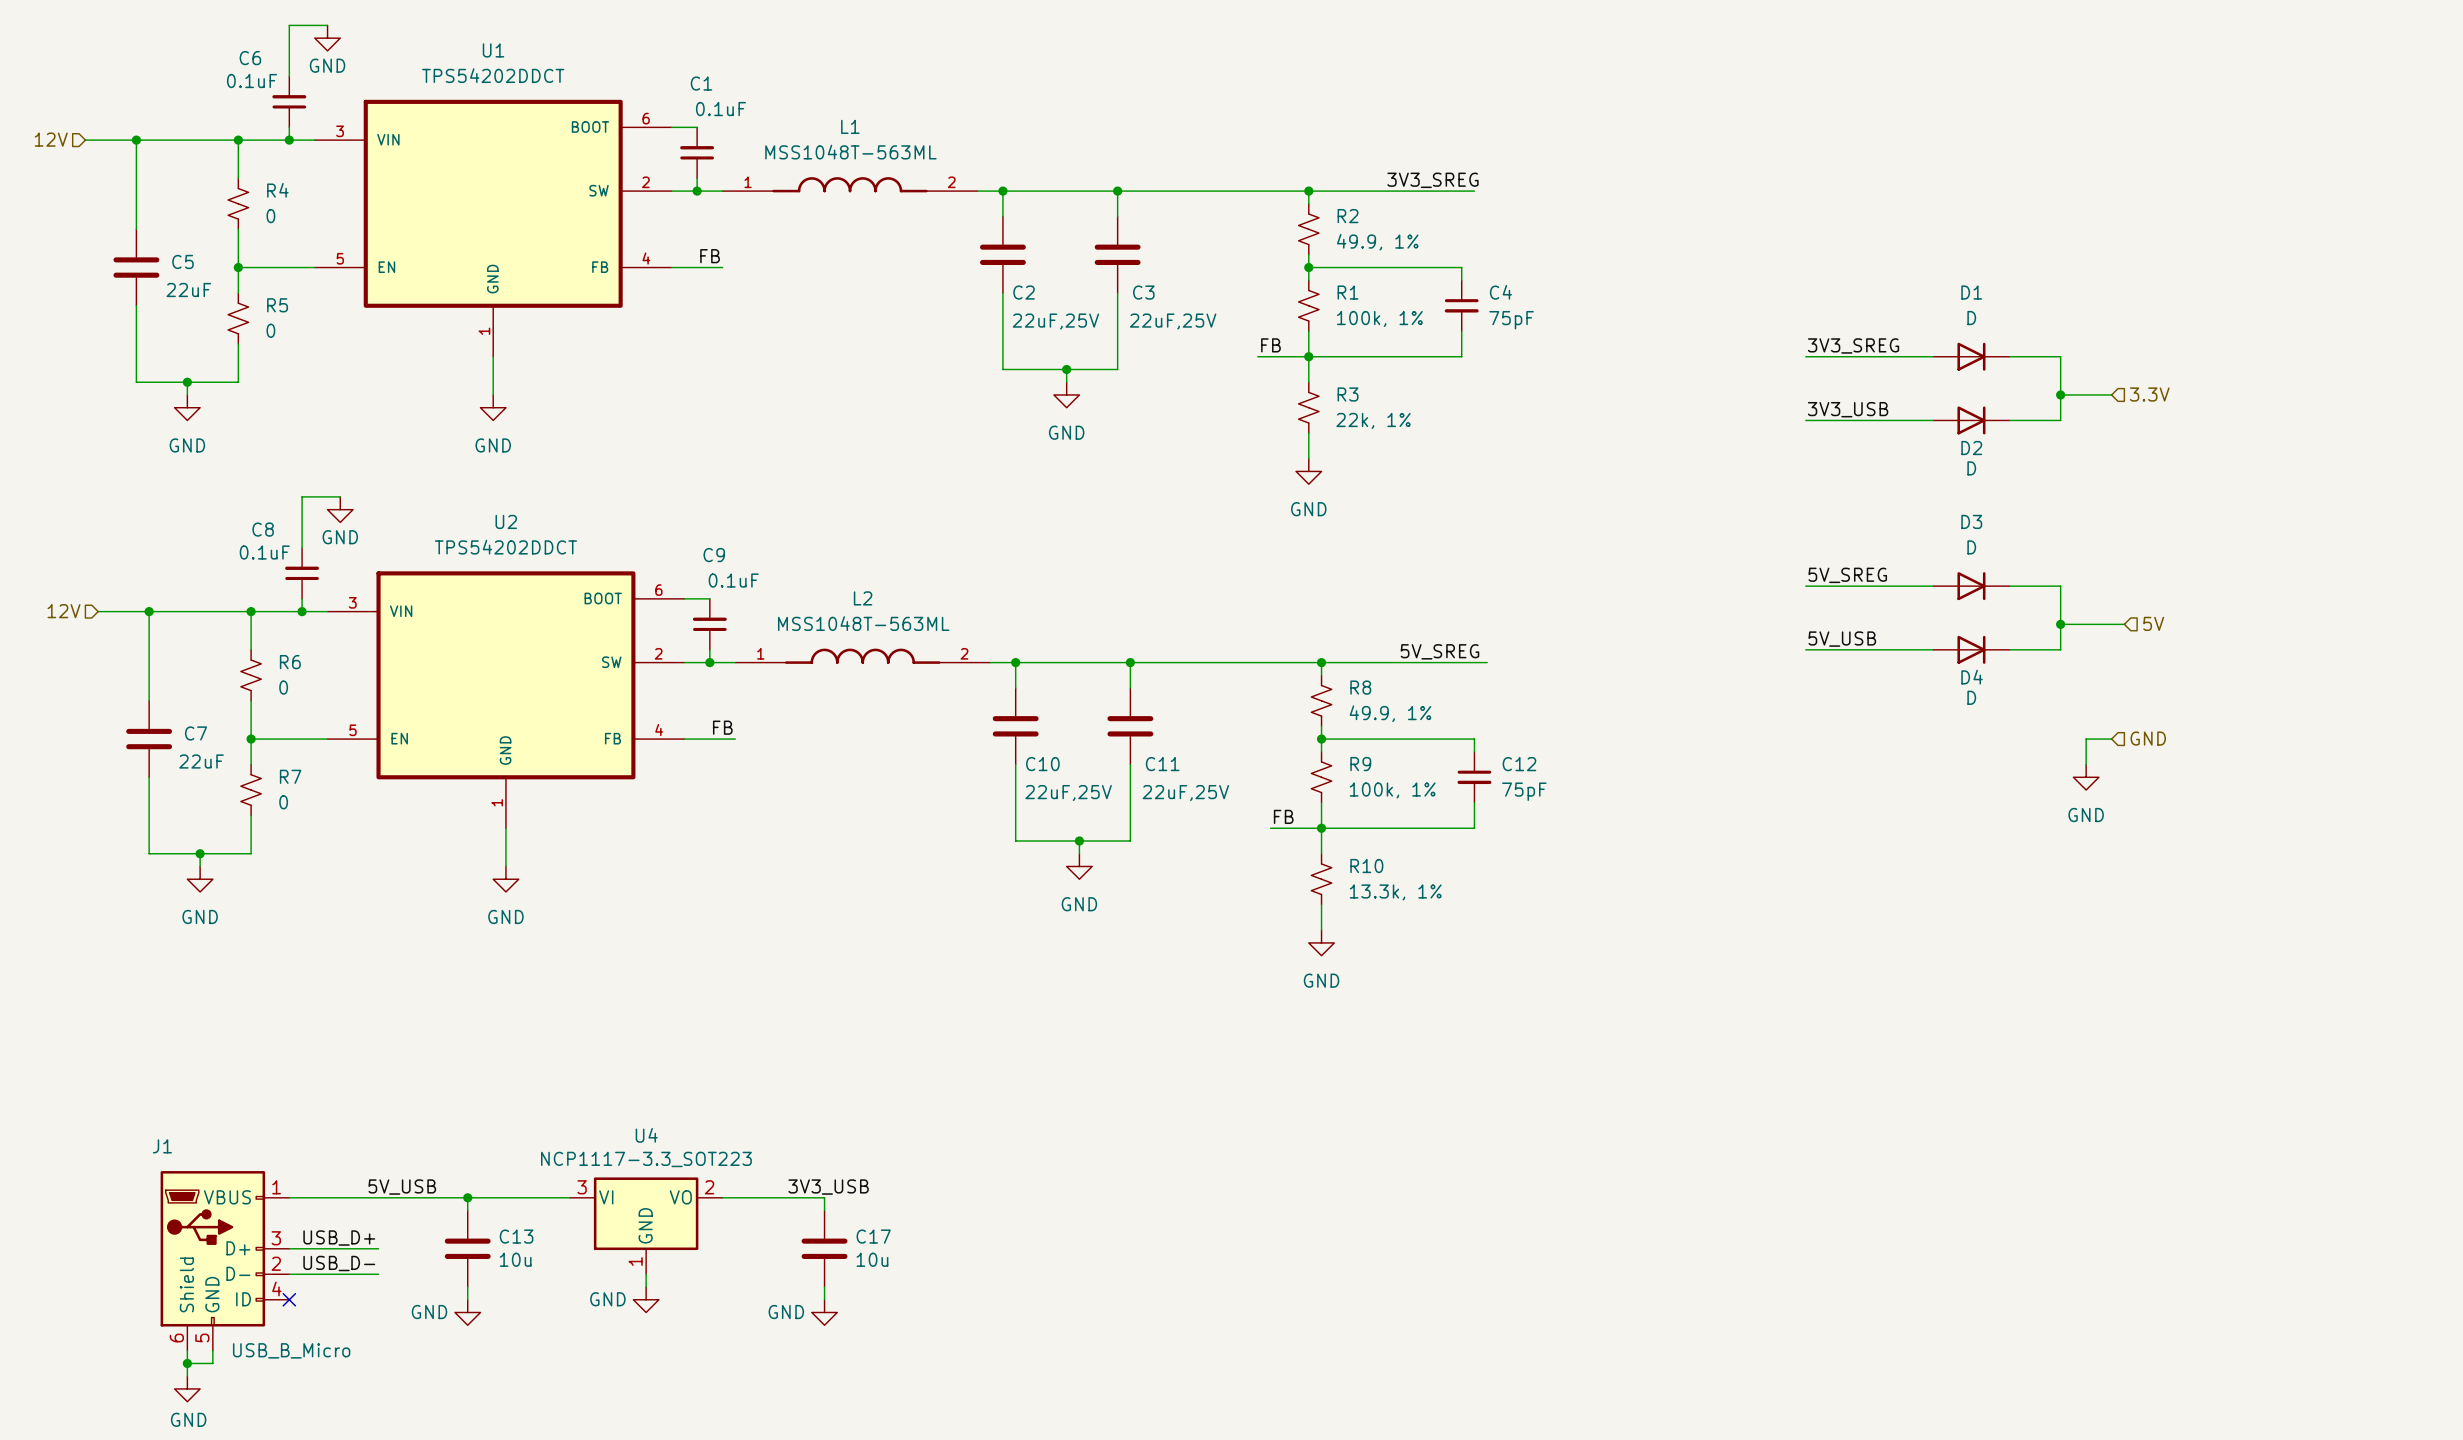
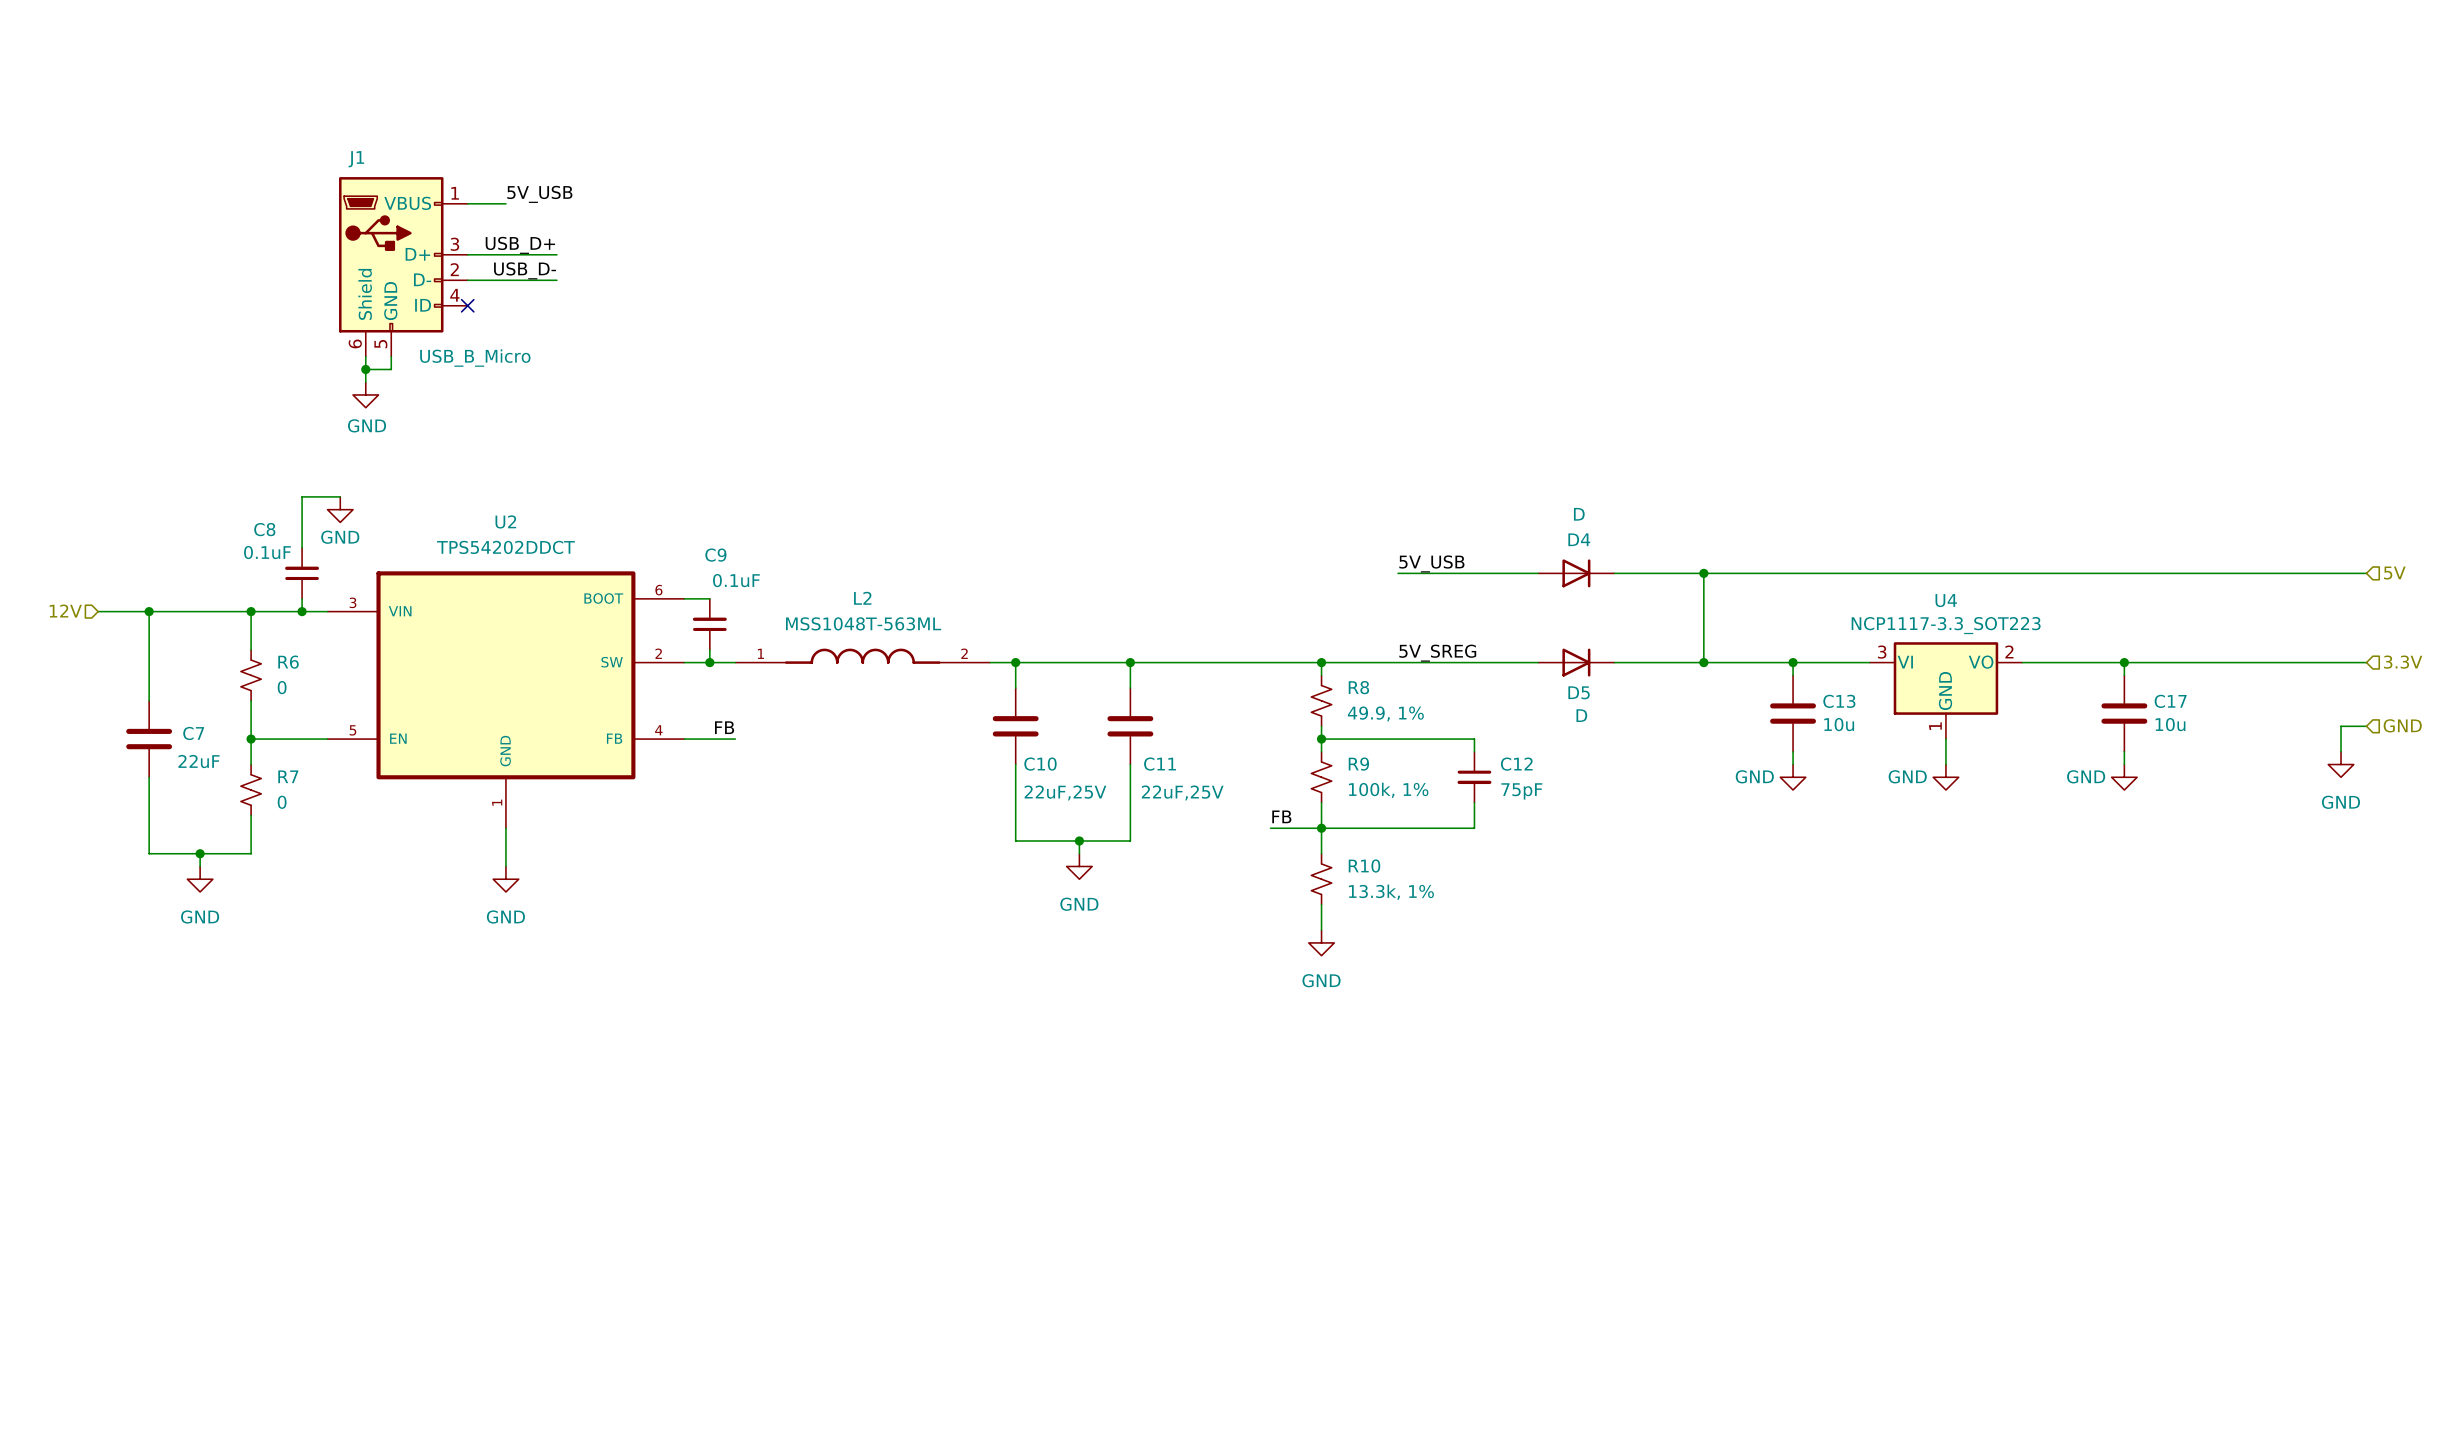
wire: (327, 25) (289, 25) (289, 76) -> none
power symbol: GND (327, 38) -> none
C6: 0.1uF (289, 101) -> none
wire: (289, 127) (289, 140) -> none
wire: (671, 127) (697, 127) -> none
hierarchical label: 12V (51, 139) -> none
wire: (85, 140) (314, 140) -> none
wire: (136, 140) (136, 229) -> none
junction: (136, 140) -> none
wire: (238, 140) (238, 178) -> none
junction: (238, 140) -> none
junction: (289, 140) -> none
C1: 0.1uF (697, 152) -> none
wire: (697, 178) (697, 191) -> none
label: 3V3_SREG (1432, 180) -> none
L1: MSS1048T-563ML (850, 184) -> none
wire: (671, 191) (722, 191) -> none
junction: (697, 191) -> none
wire: (977, 191) (1474, 191) -> none
wire: (1002, 191) (1002, 216) -> none
junction: (1002, 191) -> none
wire: (1117, 191) (1117, 216) -> none
junction: (1117, 191) -> none
wire: (1308, 191) (1308, 203) -> none
junction: (1308, 191) -> none
label: none -> 5V_USB (539, 194)
R4: 0 (238, 203) -> none
U1: TPS54202DDCT (493, 228) -> none
wire: (238, 229) (238, 293) -> none
R2: 49.9, 1% (1308, 229) -> none
label: none -> USB_D+ (520, 245)
C2: 22uF,25V (1002, 254) -> none
C3: 22uF,25V (1117, 254) -> none
wire: (1308, 254) (1308, 280) -> none
label: FB (710, 256) -> none
C5: 22uF (136, 267) -> none
wire: (238, 267) (314, 267) -> none
junction: (238, 267) -> none
wire: (671, 267) (722, 267) -> none
wire: (1308, 267) (1461, 267) (1461, 280) -> none
junction: (1308, 267) -> none
label: none -> USB_D- (525, 270)
wire: (1002, 293) (1002, 369) (1117, 369) (1117, 293) -> none
wire: (136, 305) (136, 382) (238, 382) (238, 344) -> none
no-connect mark: none -> (467, 305)
R1: 100k, 1% (1308, 305) -> none
C4: 75pF (1461, 305) -> none
R5: 0 (238, 318) -> none
wire: (1308, 331) (1308, 382) -> none
wire: (1461, 331) (1461, 356) (1257, 356) -> none
label: FB (1270, 345) -> none
label: 3V3_SREG (1853, 345) -> none
wire: none -> (365, 356) (365, 382)
wire: none -> (391, 356) (391, 369) (365, 369)
wire: (493, 356) (493, 394) -> none
junction: (1308, 356) -> none
wire: (1805, 356) (1933, 356) -> none
D1: D (1971, 356) -> none
wire: (2009, 356) (2060, 356) (2060, 420) (2009, 420) -> none
junction: none -> (365, 369)
wire: (1066, 369) (1066, 382) -> none
junction: (1066, 369) -> none
wire: (187, 382) (187, 394) -> none
junction: (187, 382) -> none
power symbol: none -> GND (365, 394)
power symbol: GND (1066, 394) -> none
wire: (2060, 394) (2111, 394) -> none
junction: (2060, 394) -> none
hierarchical label: 3.3V (2149, 394) -> none
power symbol: GND (187, 407) -> none
power symbol: GND (493, 407) -> none
R3: 22k, 1% (1308, 407) -> none
label: 3V3_USB (1848, 409) -> none
wire: (1805, 420) (1933, 420) -> none
D2: D (1971, 420) -> none
wire: (1308, 433) (1308, 458) -> none
power symbol: GND (1308, 471) -> none
label: none -> 5V_USB (1431, 563)
wire: none -> (1397, 573) (1538, 573)
wire: none -> (1614, 573) (2366, 573)
wire: none -> (1703, 573) (1703, 662)
junction: none -> (1703, 573)
label: 5V_SREG (1847, 575) -> none
wire: (1805, 586) (1933, 586) -> none
D3: D (1971, 586) -> none
wire: (2009, 586) (2060, 586) (2060, 649) (2009, 649) -> none
hierarchical label position: 5V (2153, 623) -> 5V (2394, 573)
wire: (2060, 624) (2124, 624) -> none
junction: (2060, 624) -> none
label: 5V_USB (1842, 639) -> none
wire: (1805, 649) (1933, 649) -> none
D4 position: (1971, 649) -> (1576, 573)
wire: none -> (1487, 662) (1538, 662)
D5: none -> D (1576, 662)
wire: none -> (1614, 662) (1869, 662)
junction: none -> (1703, 662)
wire: none -> (1793, 662) (1793, 675)
junction: none -> (1793, 662)
wire: none -> (2022, 662) (2366, 662)
wire: none -> (2124, 662) (2124, 675)
junction: none -> (2124, 662)
hierarchical label: none -> 3.3V (2403, 662)
D4 name position: D4 (1972, 677) -> D4 (1579, 539)
D4 value position: D (1971, 697) -> D (1579, 514)
hierarchical label: none -> GND (2402, 725)
wire: none -> (2366, 726) (2341, 726) (2341, 751)
hierarchical label: GND (2148, 738) -> none
wire: none -> (1945, 739) (1945, 764)
wire: (2111, 739) (2086, 739) (2086, 764) -> none
wire: none -> (1793, 751) (1793, 764)
wire: none -> (2124, 751) (2124, 764)
power symbol: none -> GND (2341, 764)
power symbol: none -> GND (1793, 777)
power symbol: none -> GND (1945, 777)
power symbol position: GND (2086, 777) -> GND (2124, 777)
power symbol text position: GND (2086, 815) -> GND (2086, 776)
J1 name position: J1 (162, 1146) -> J1 (356, 159)
label: 5V_USB (402, 1187) -> none
label: 3V3_USB (828, 1187) -> none
wire: (289, 1197) (569, 1197) -> none
wire: (467, 1197) (467, 1210) -> none
junction: (467, 1197) -> none
wire: (722, 1197) (824, 1197) (824, 1210) -> none
U4 position: (646, 1225) -> (1945, 690)
label: USB_D+ (339, 1238) -> none
wire: (289, 1248) (378, 1248) -> none
C13 position: (467, 1248) -> (1793, 713)
C17 position: (824, 1248) -> (2124, 713)
J1 position: (224, 1260) -> (403, 266)
label: USB_D- (339, 1263) -> none
wire: (289, 1274) (378, 1274) -> none
wire: (646, 1274) (646, 1287) -> none
wire: (467, 1287) (467, 1299) -> none
wire: (824, 1287) (824, 1299) -> none
no-connect mark: (289, 1299) -> none
power symbol: GND (646, 1299) -> none
power symbol: GND (467, 1312) -> none
power symbol: GND (824, 1312) -> none
wire: (187, 1350) (187, 1376) -> none
wire: (212, 1350) (212, 1363) (187, 1363) -> none
junction: (187, 1363) -> none
power symbol: GND (187, 1388) -> none

